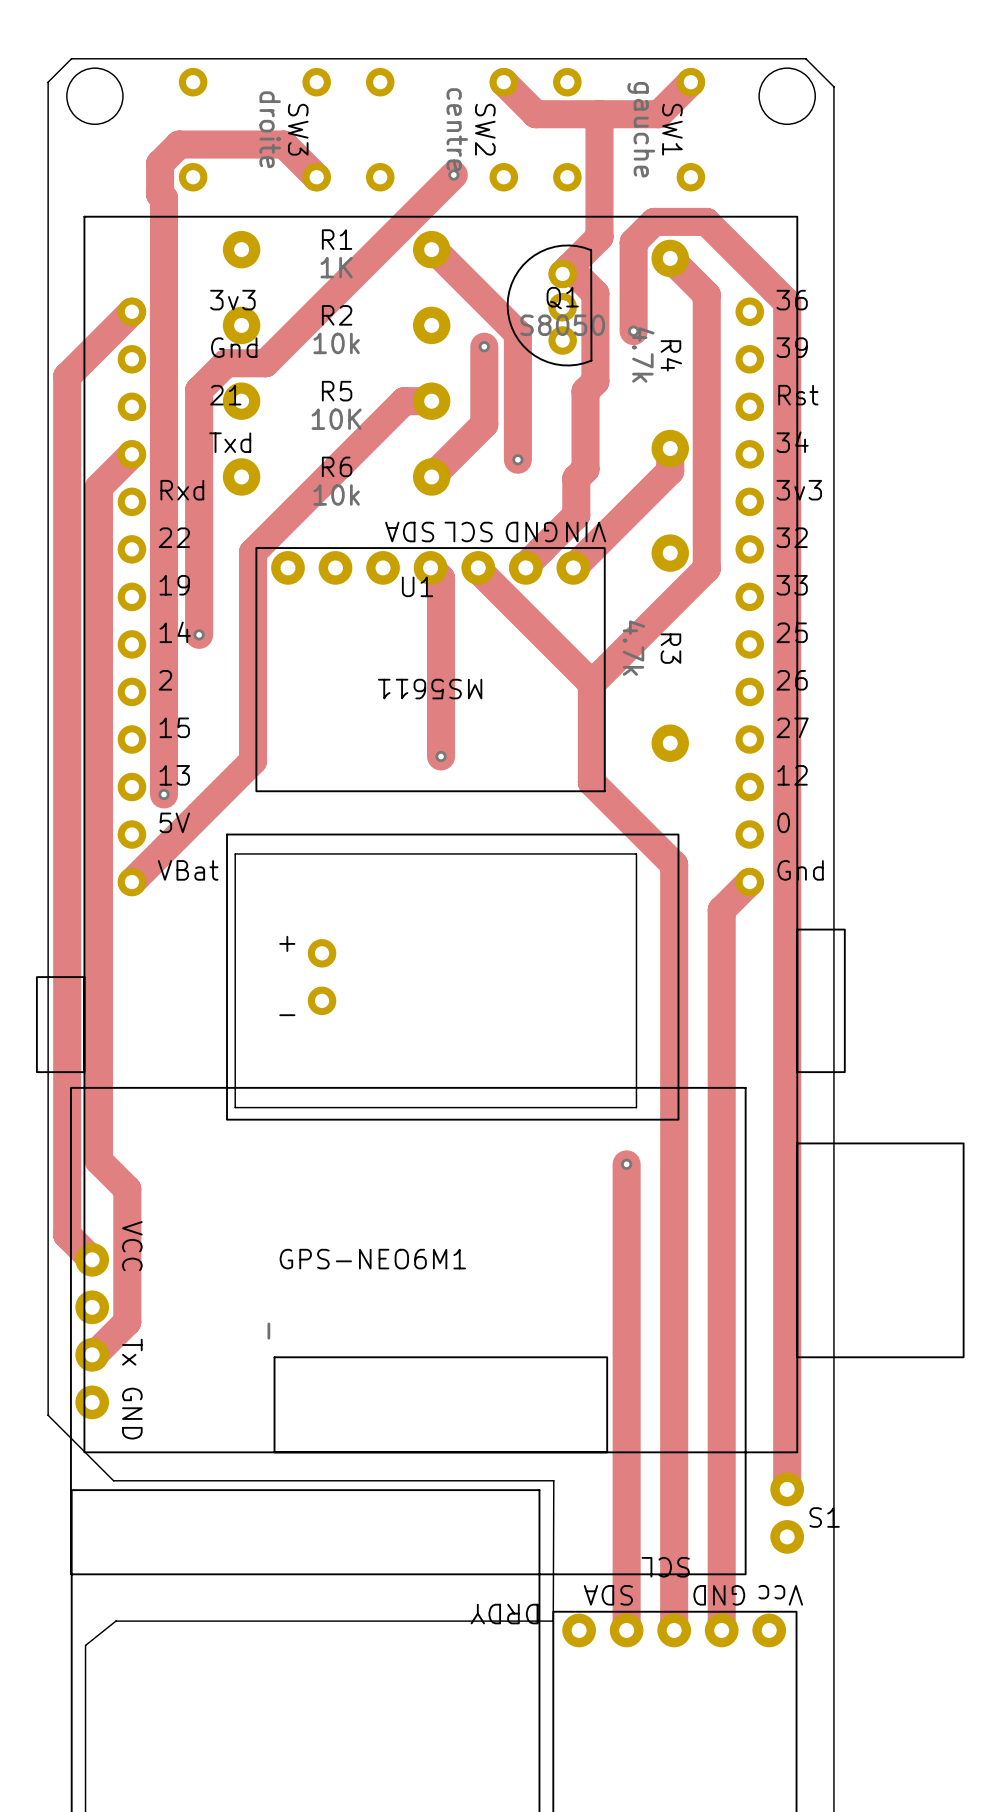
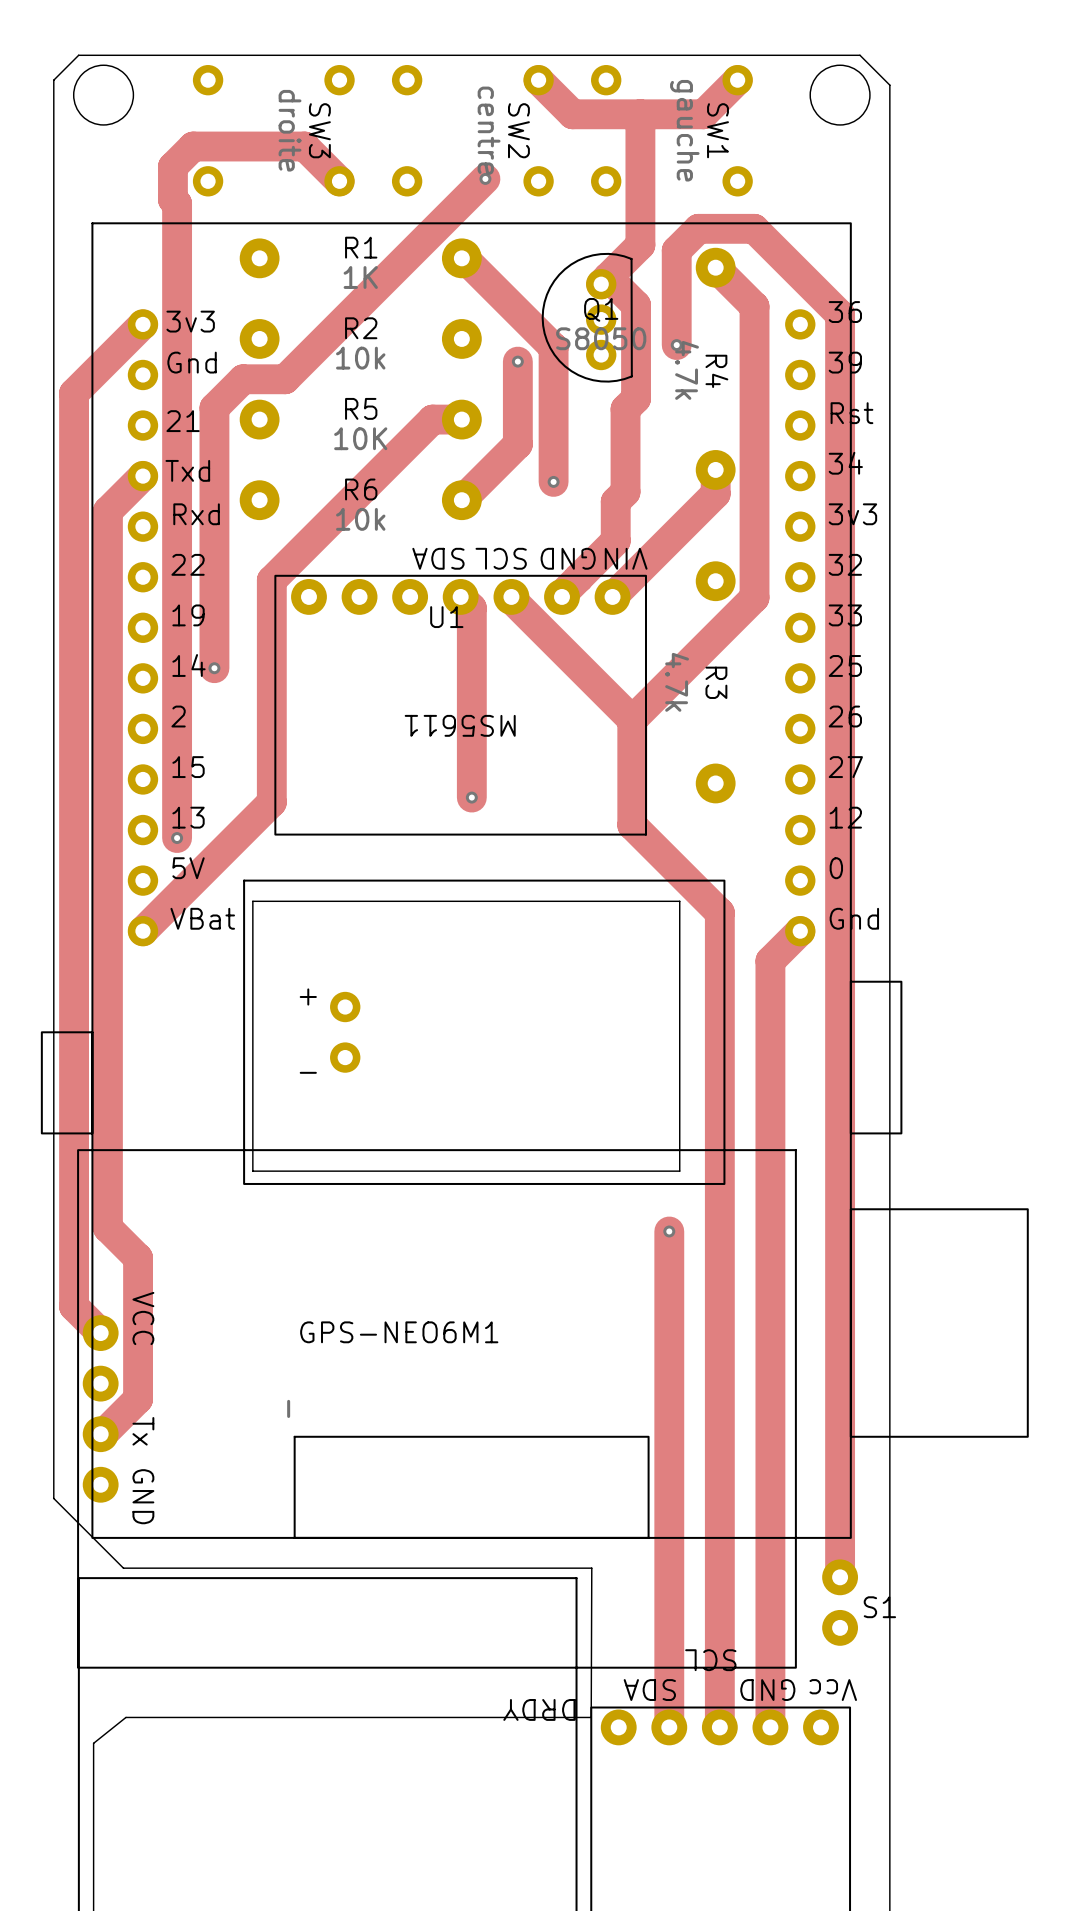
U1 text position: 3v3 (232, 300) -> 3v3 (190, 321)
U1 text position: Gnd (234, 347) -> Gnd (192, 362)
U1 text position: 21 (225, 395) -> 21 (183, 421)
U1 text position: Txd (230, 442) -> Txd (187, 470)

